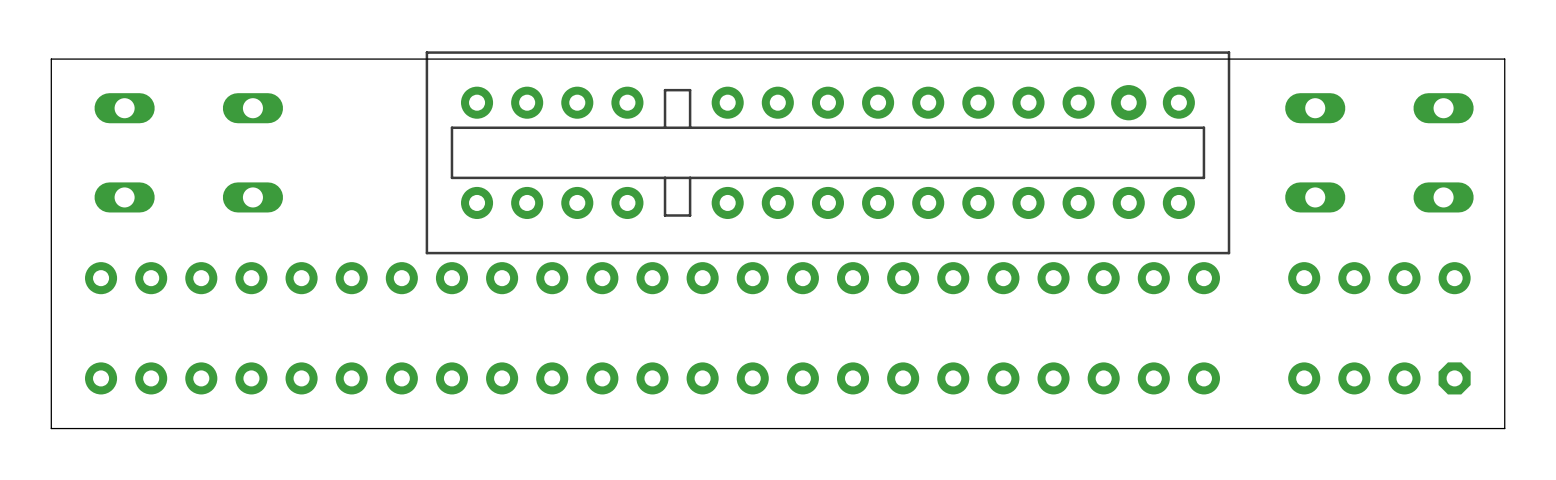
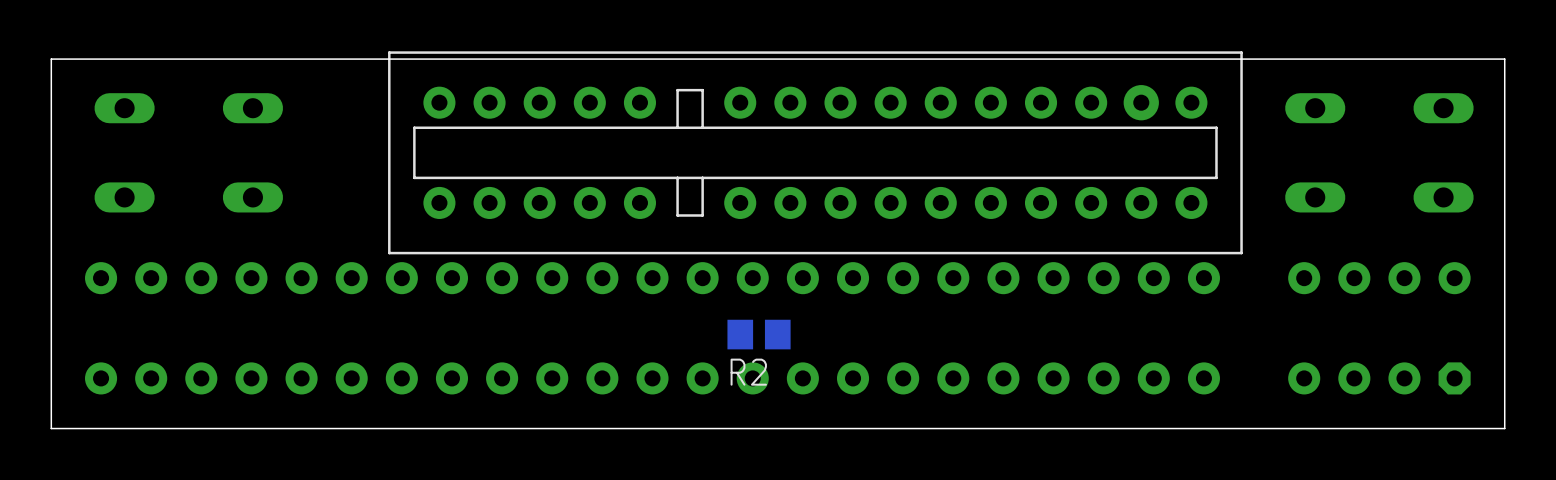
part footprint: [425, 51, 1231, 255] -> [388, 51, 1243, 255]
R2: none -> (759, 334)

